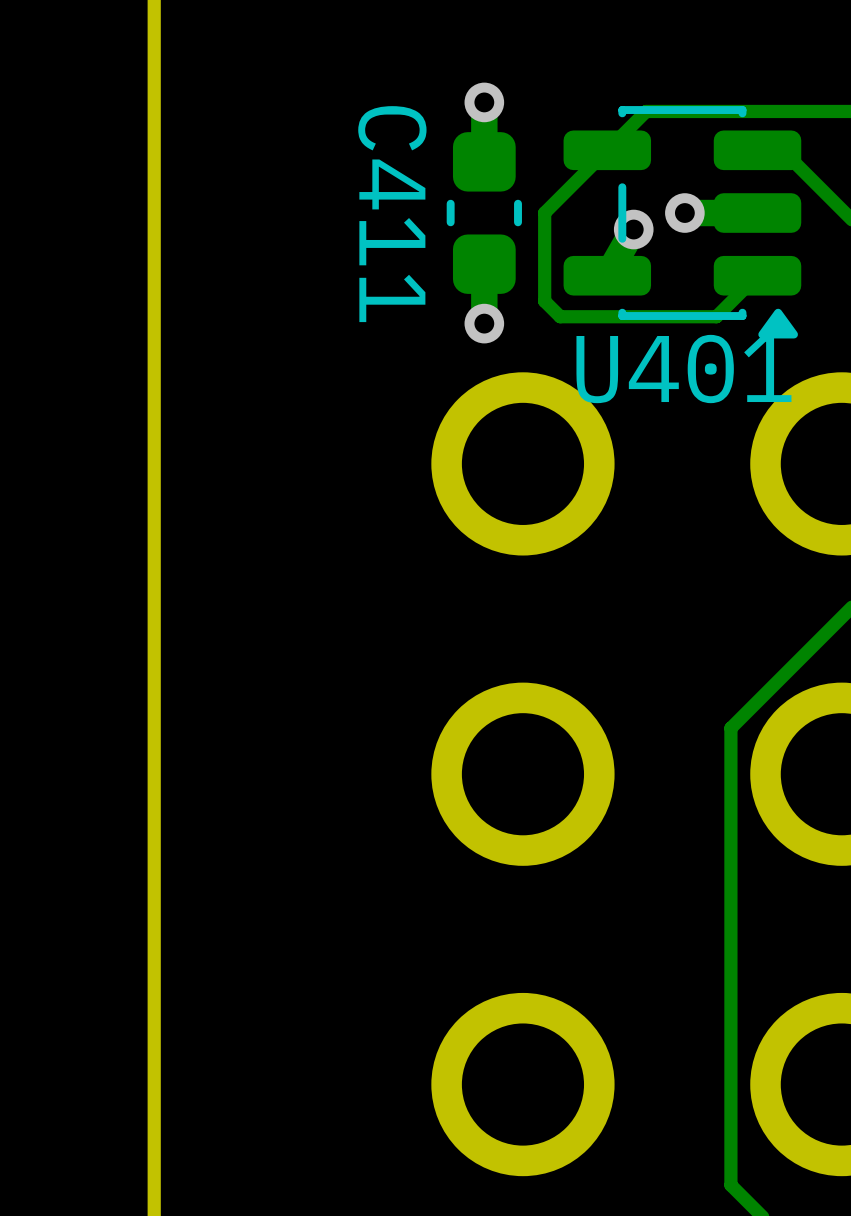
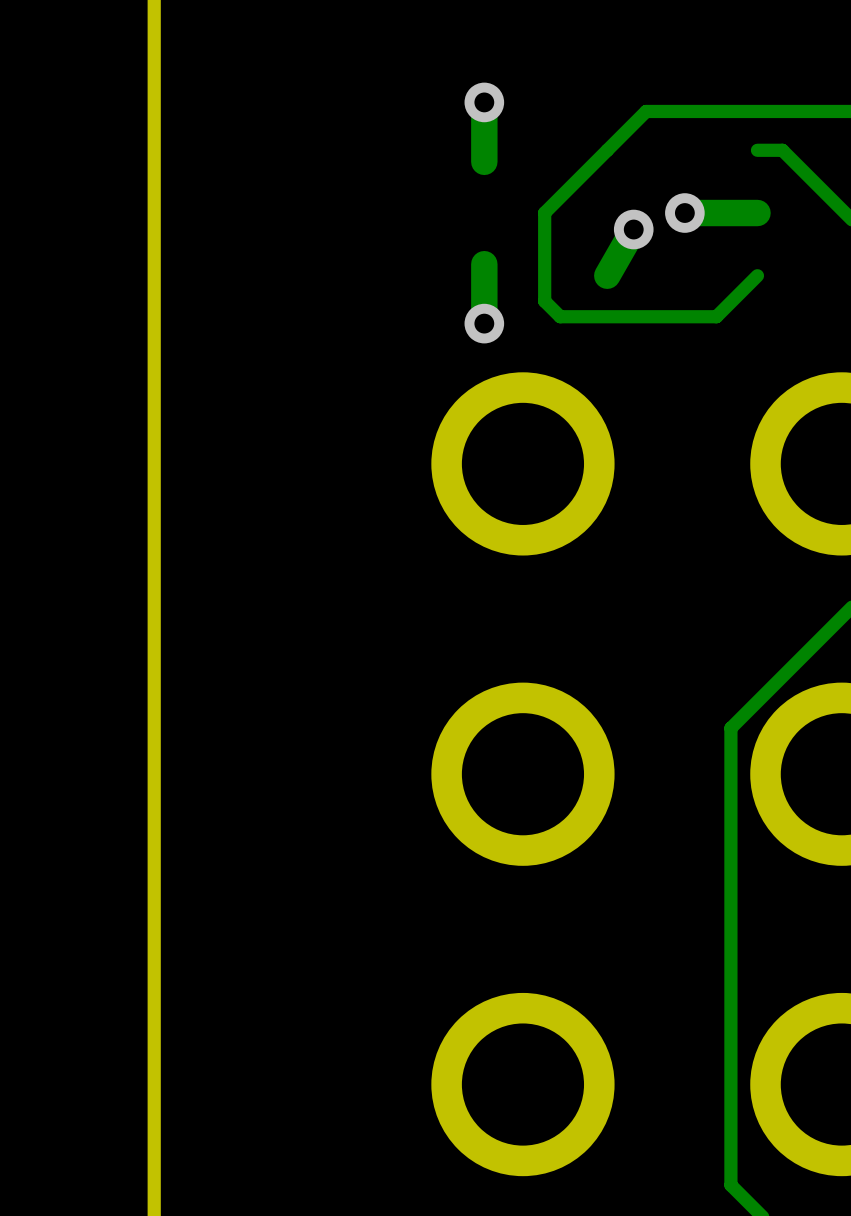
C411: (484, 213) -> none
U401: (682, 222) -> none

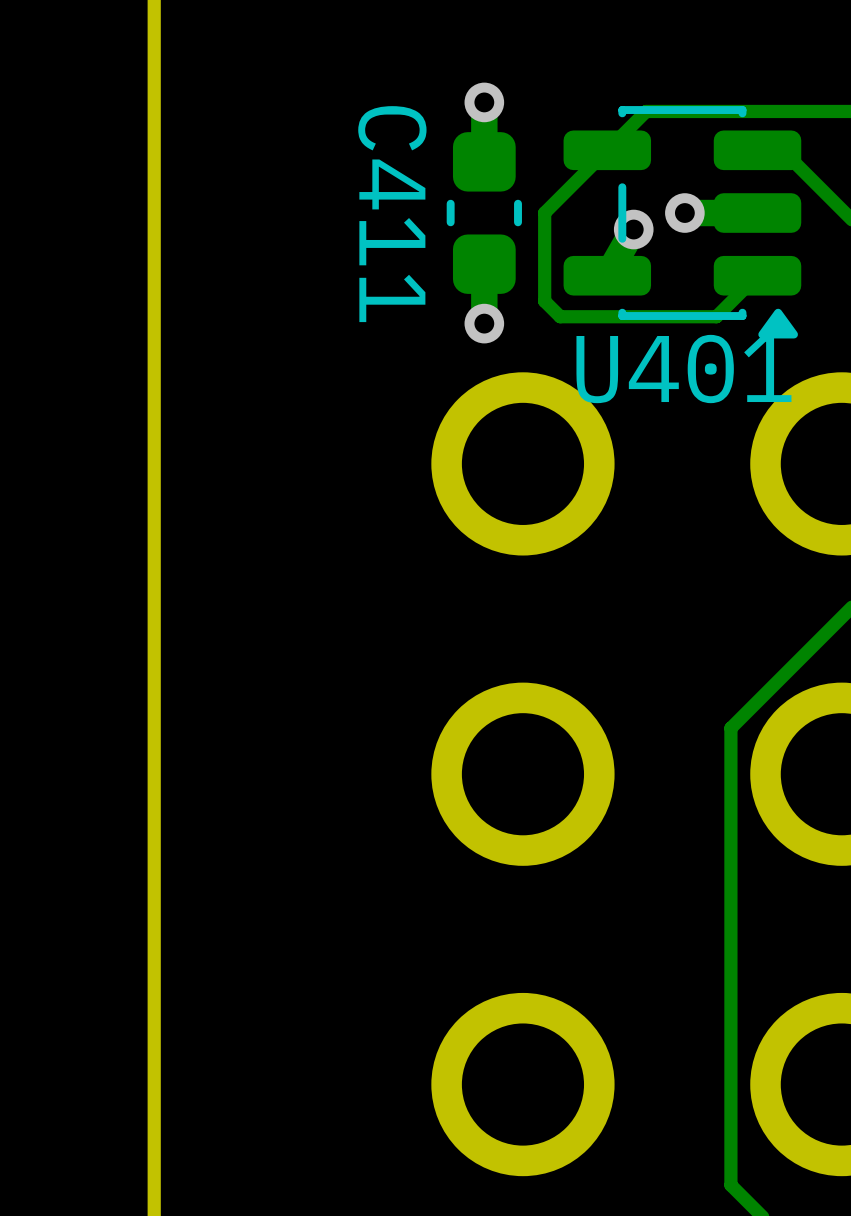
C411: none -> (484, 213)
U401: none -> (682, 222)

